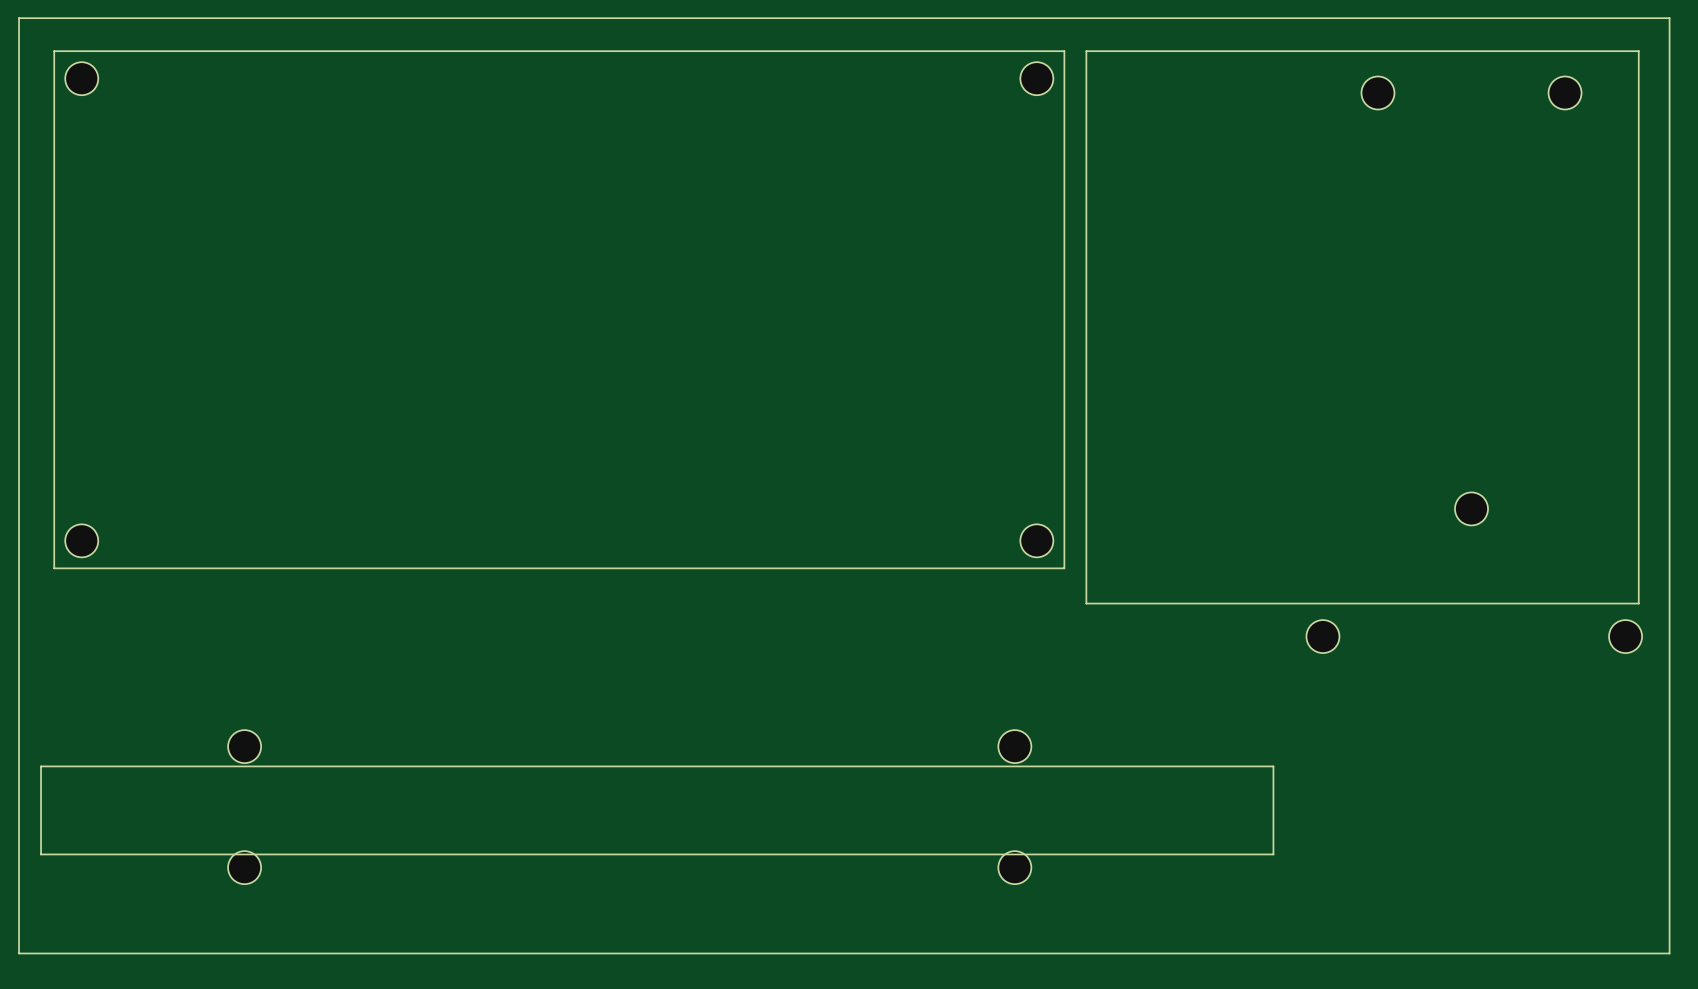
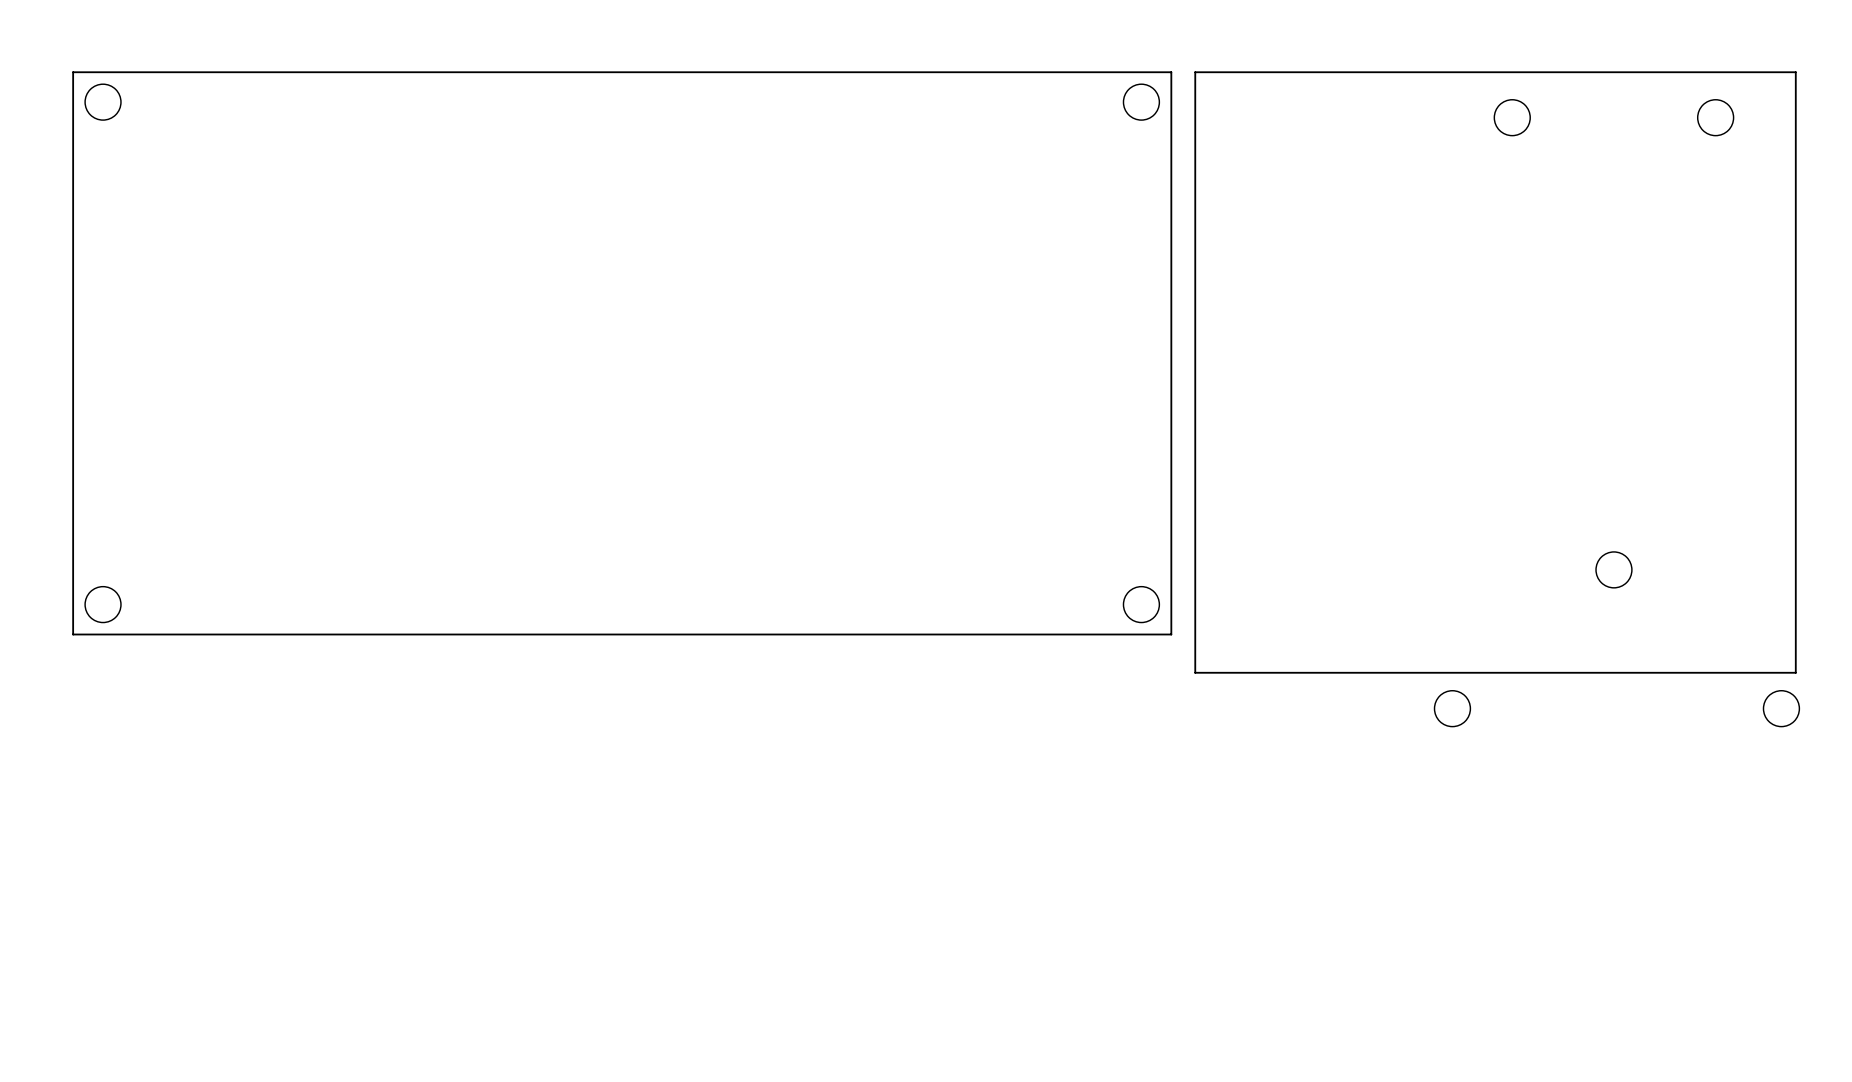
board edge: (1669, 18) (1669, 953) (19, 953) (19, 18) (1669, 18) -> none
hole: (244, 746) -> none
hole: (1014, 746) -> none
board edge: (1273, 766) (1273, 854) (41, 854) (41, 766) (1273, 766) -> none
hole: (244, 867) -> none
hole: (1014, 867) -> none

